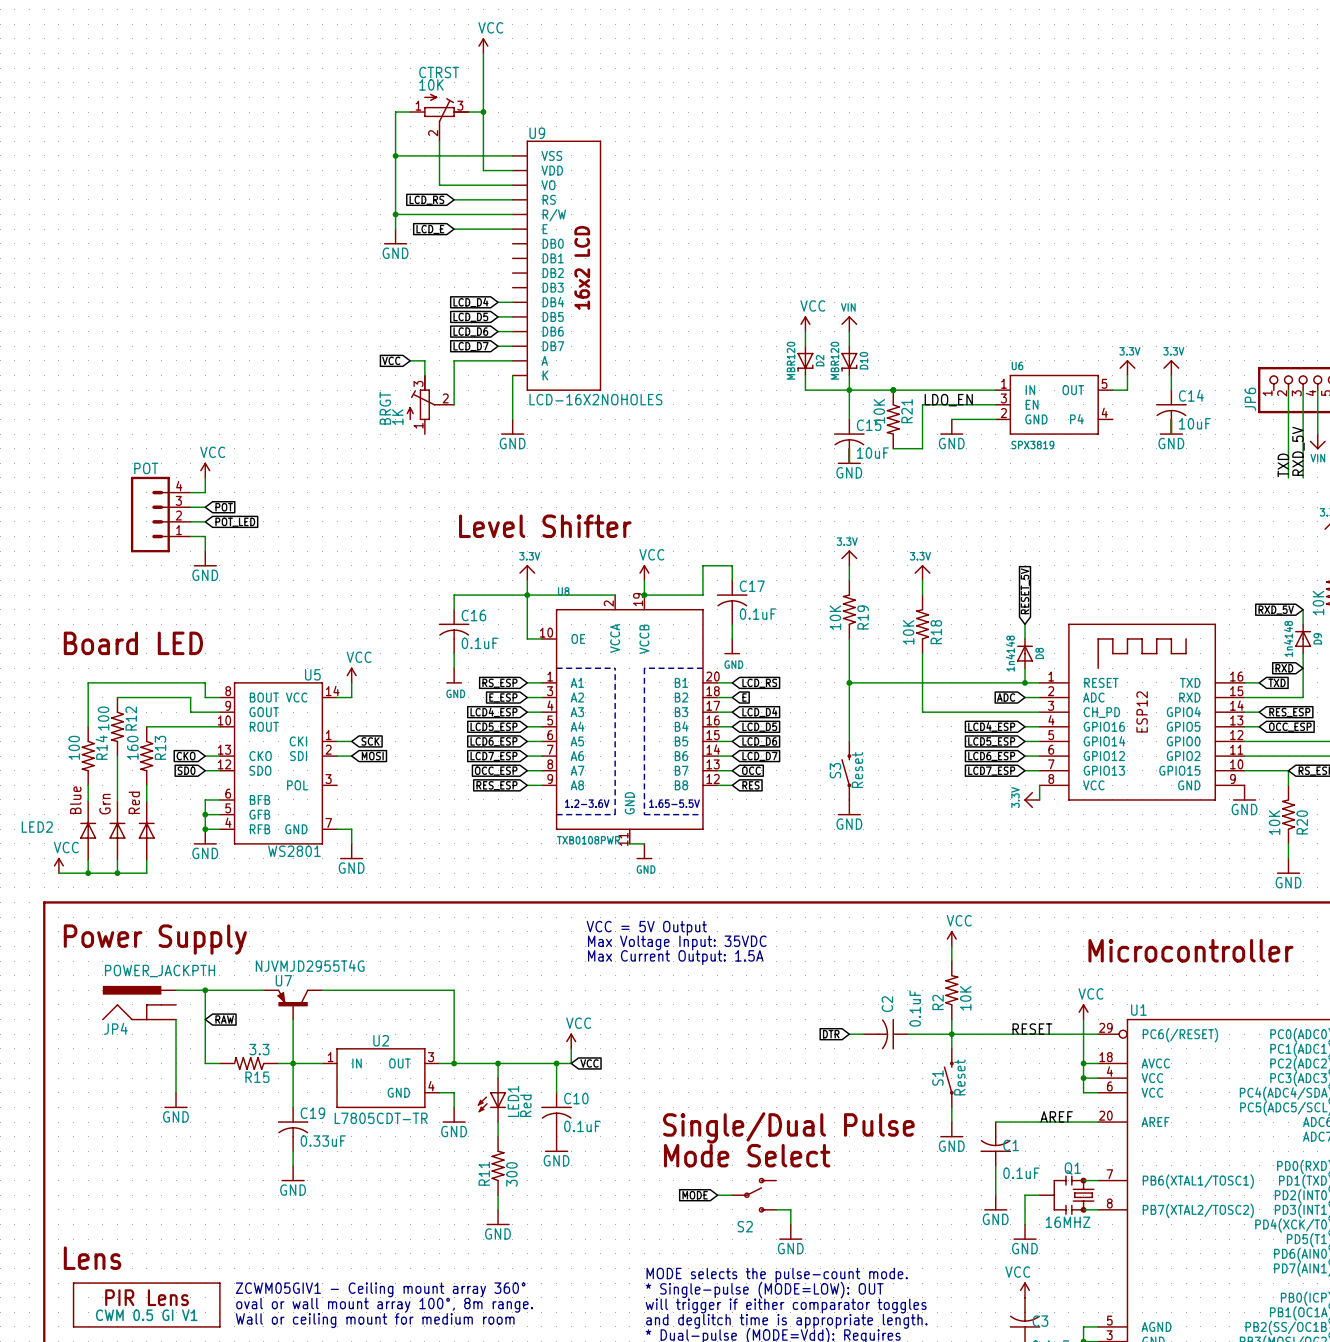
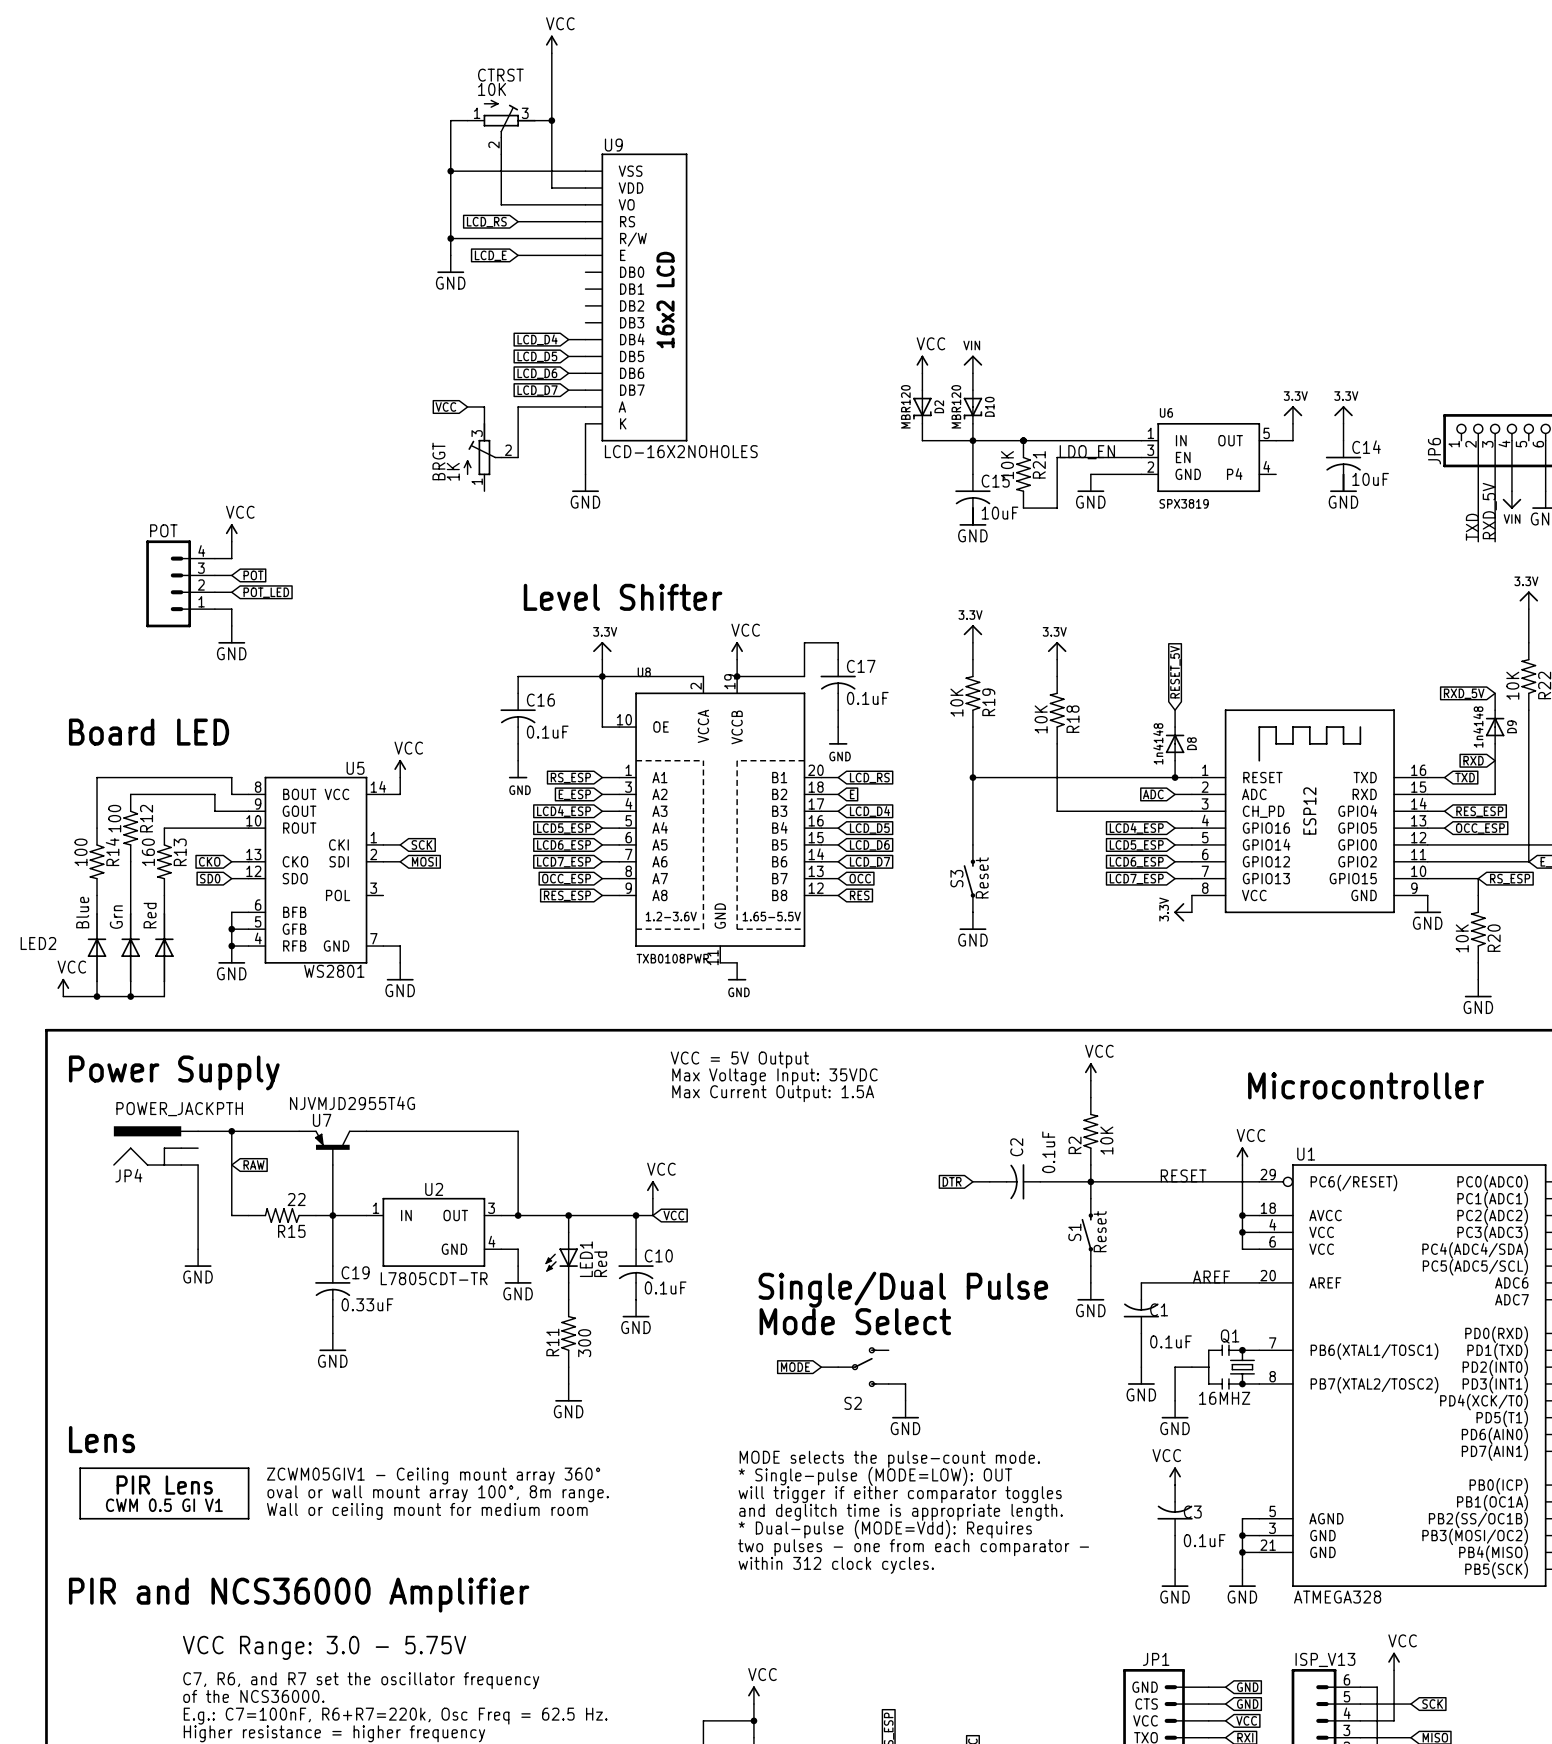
R15 value: 3.3 (259, 1049) -> 22 (296, 1199)

